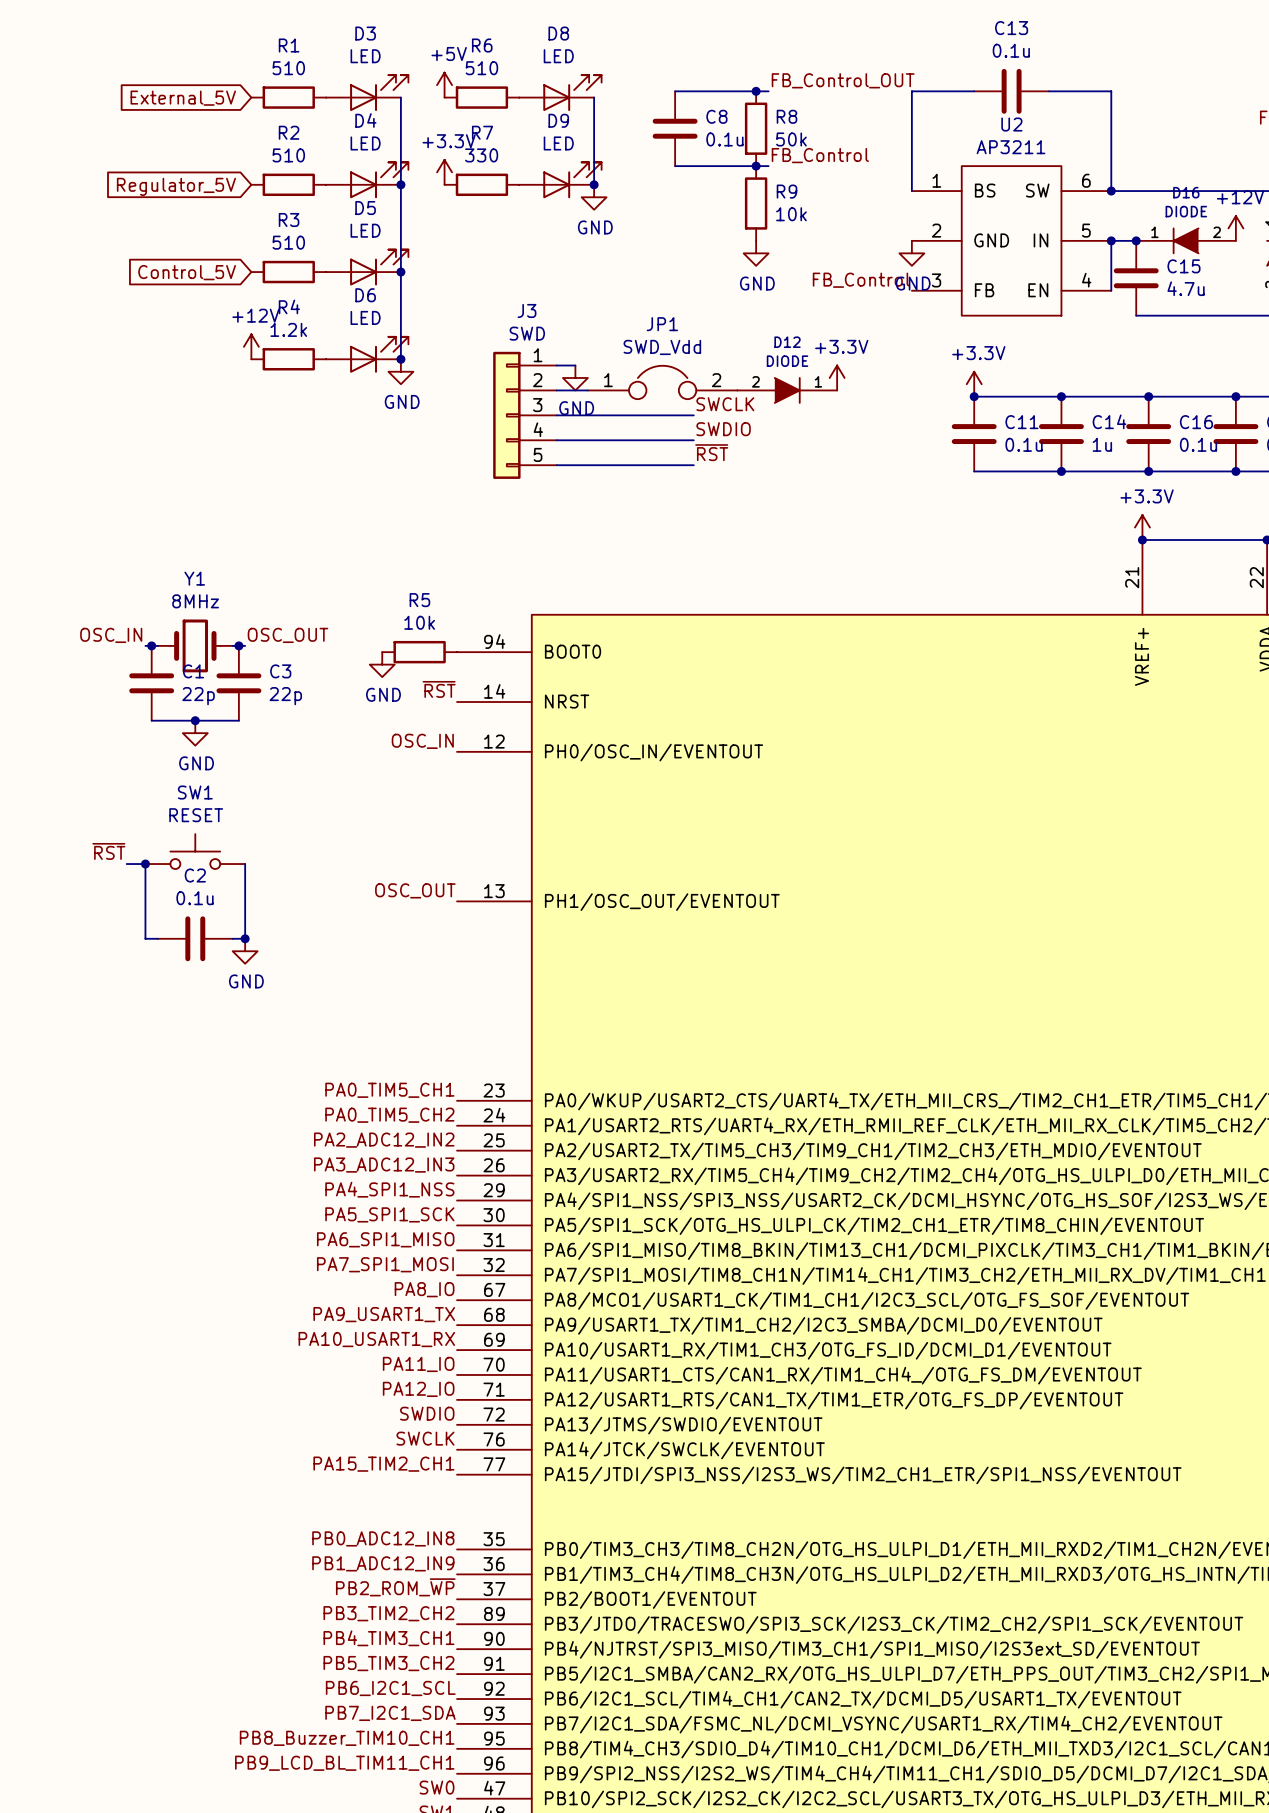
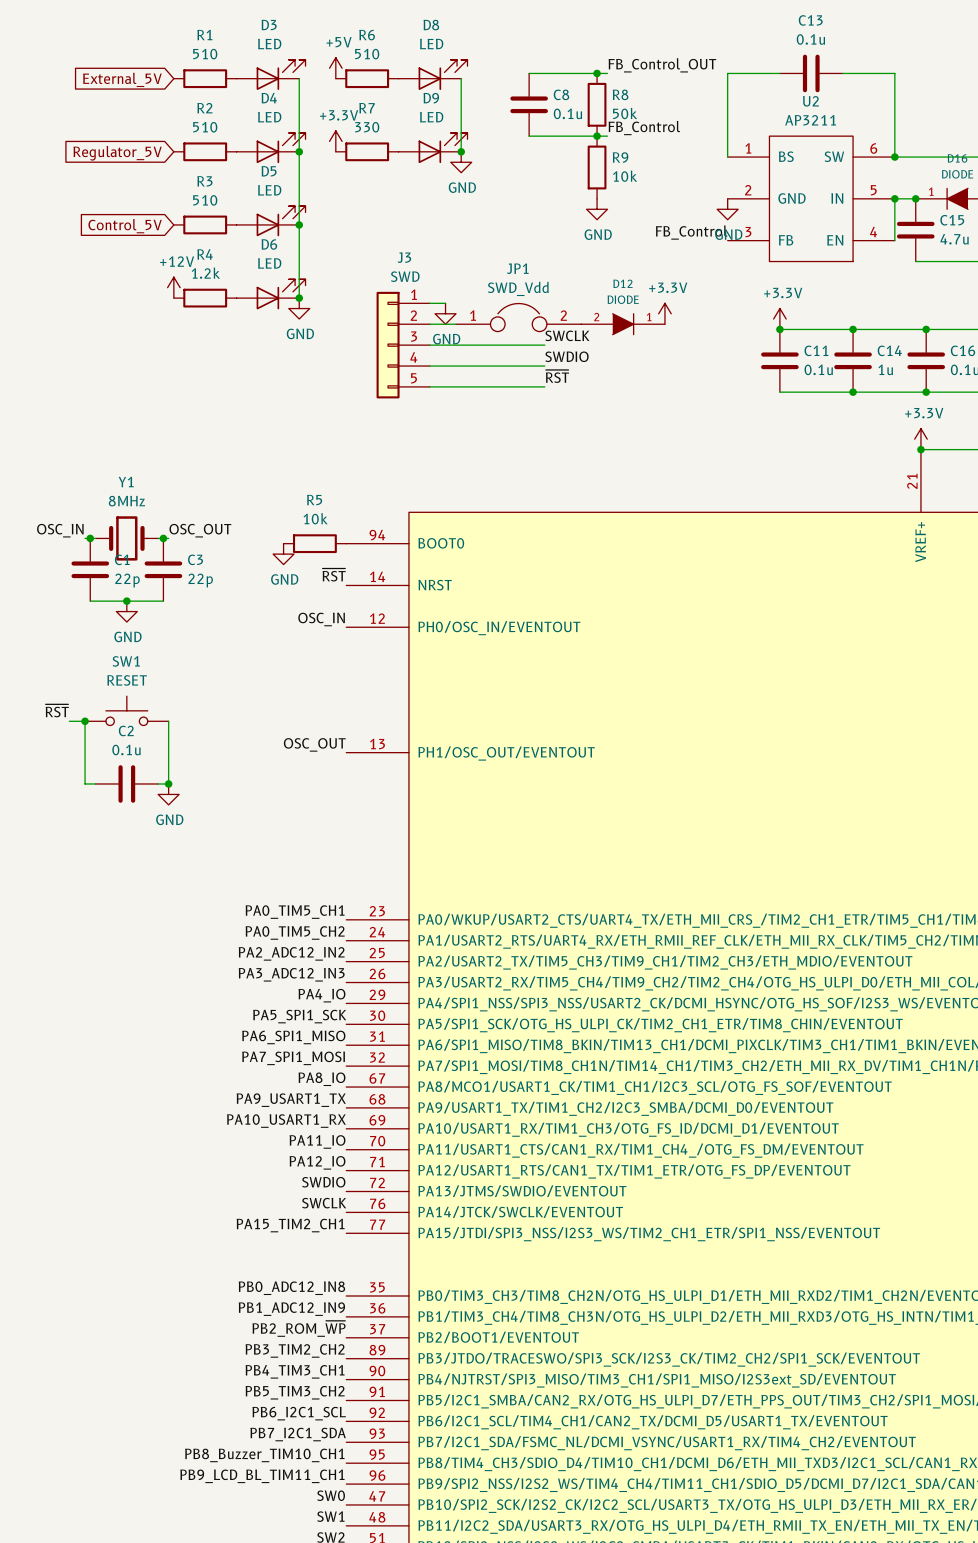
label: PA4_SPI1_NSS (389, 1189) -> PA4_IO (321, 995)

